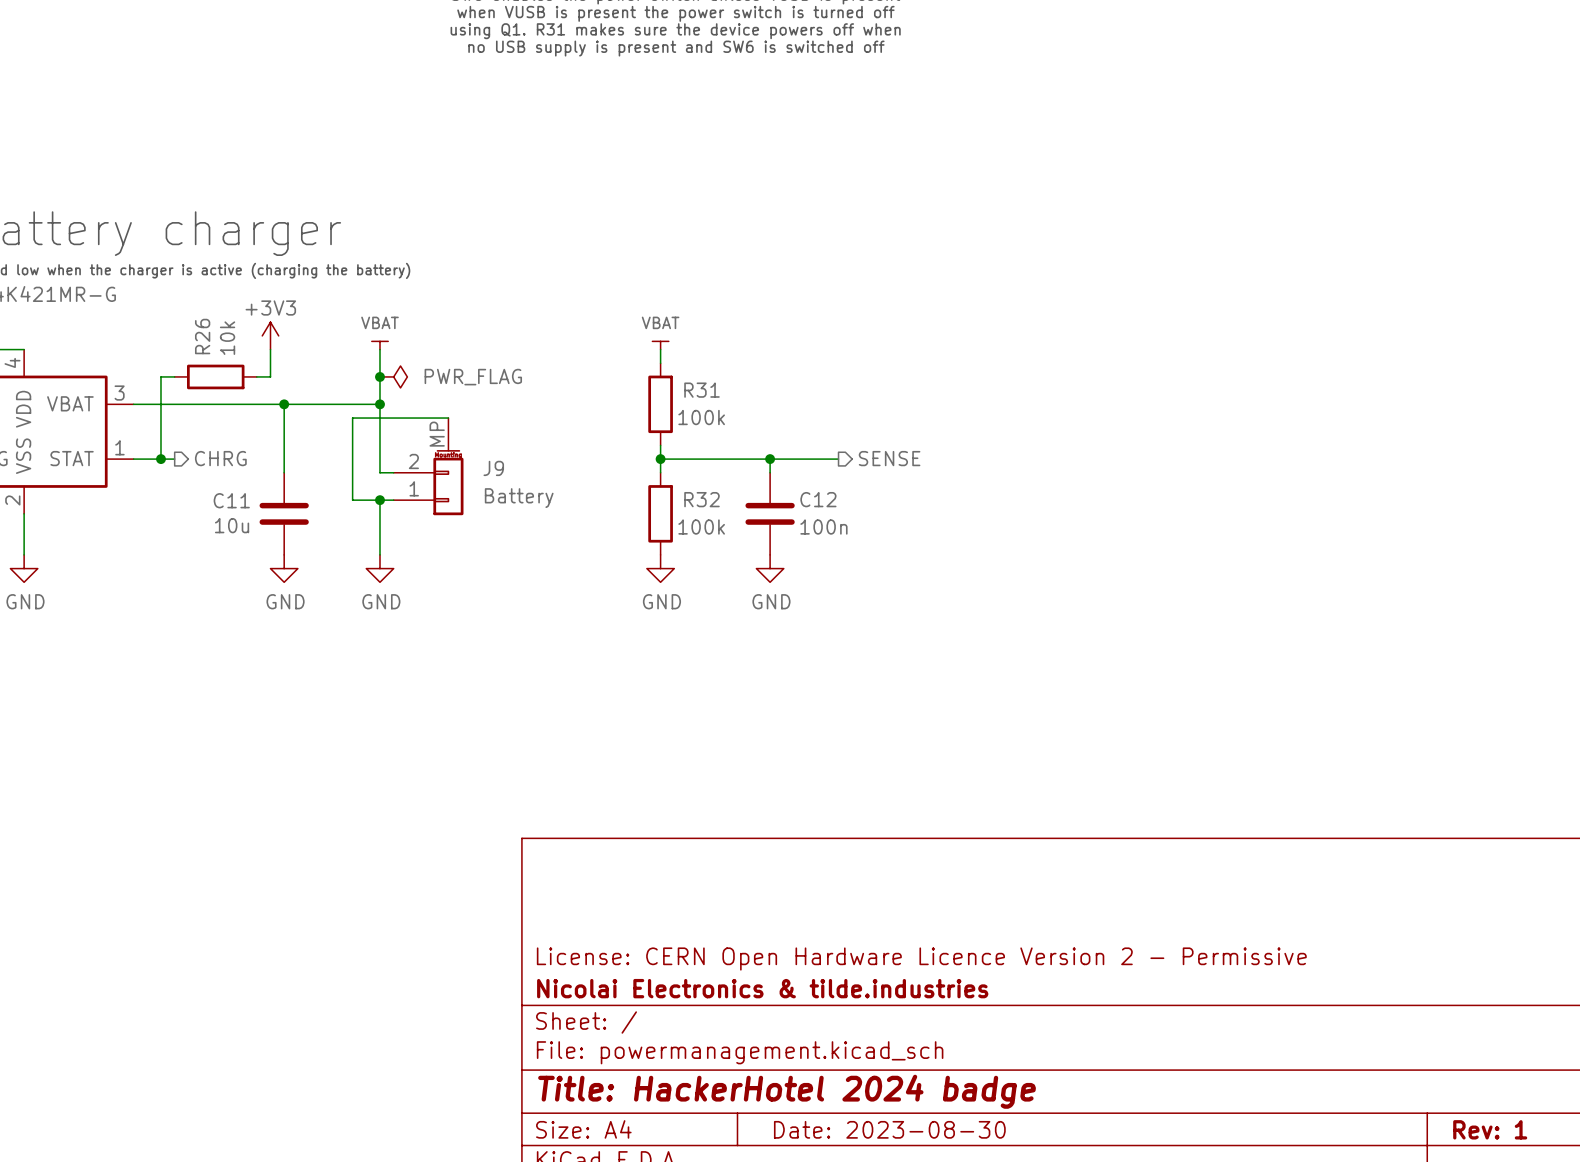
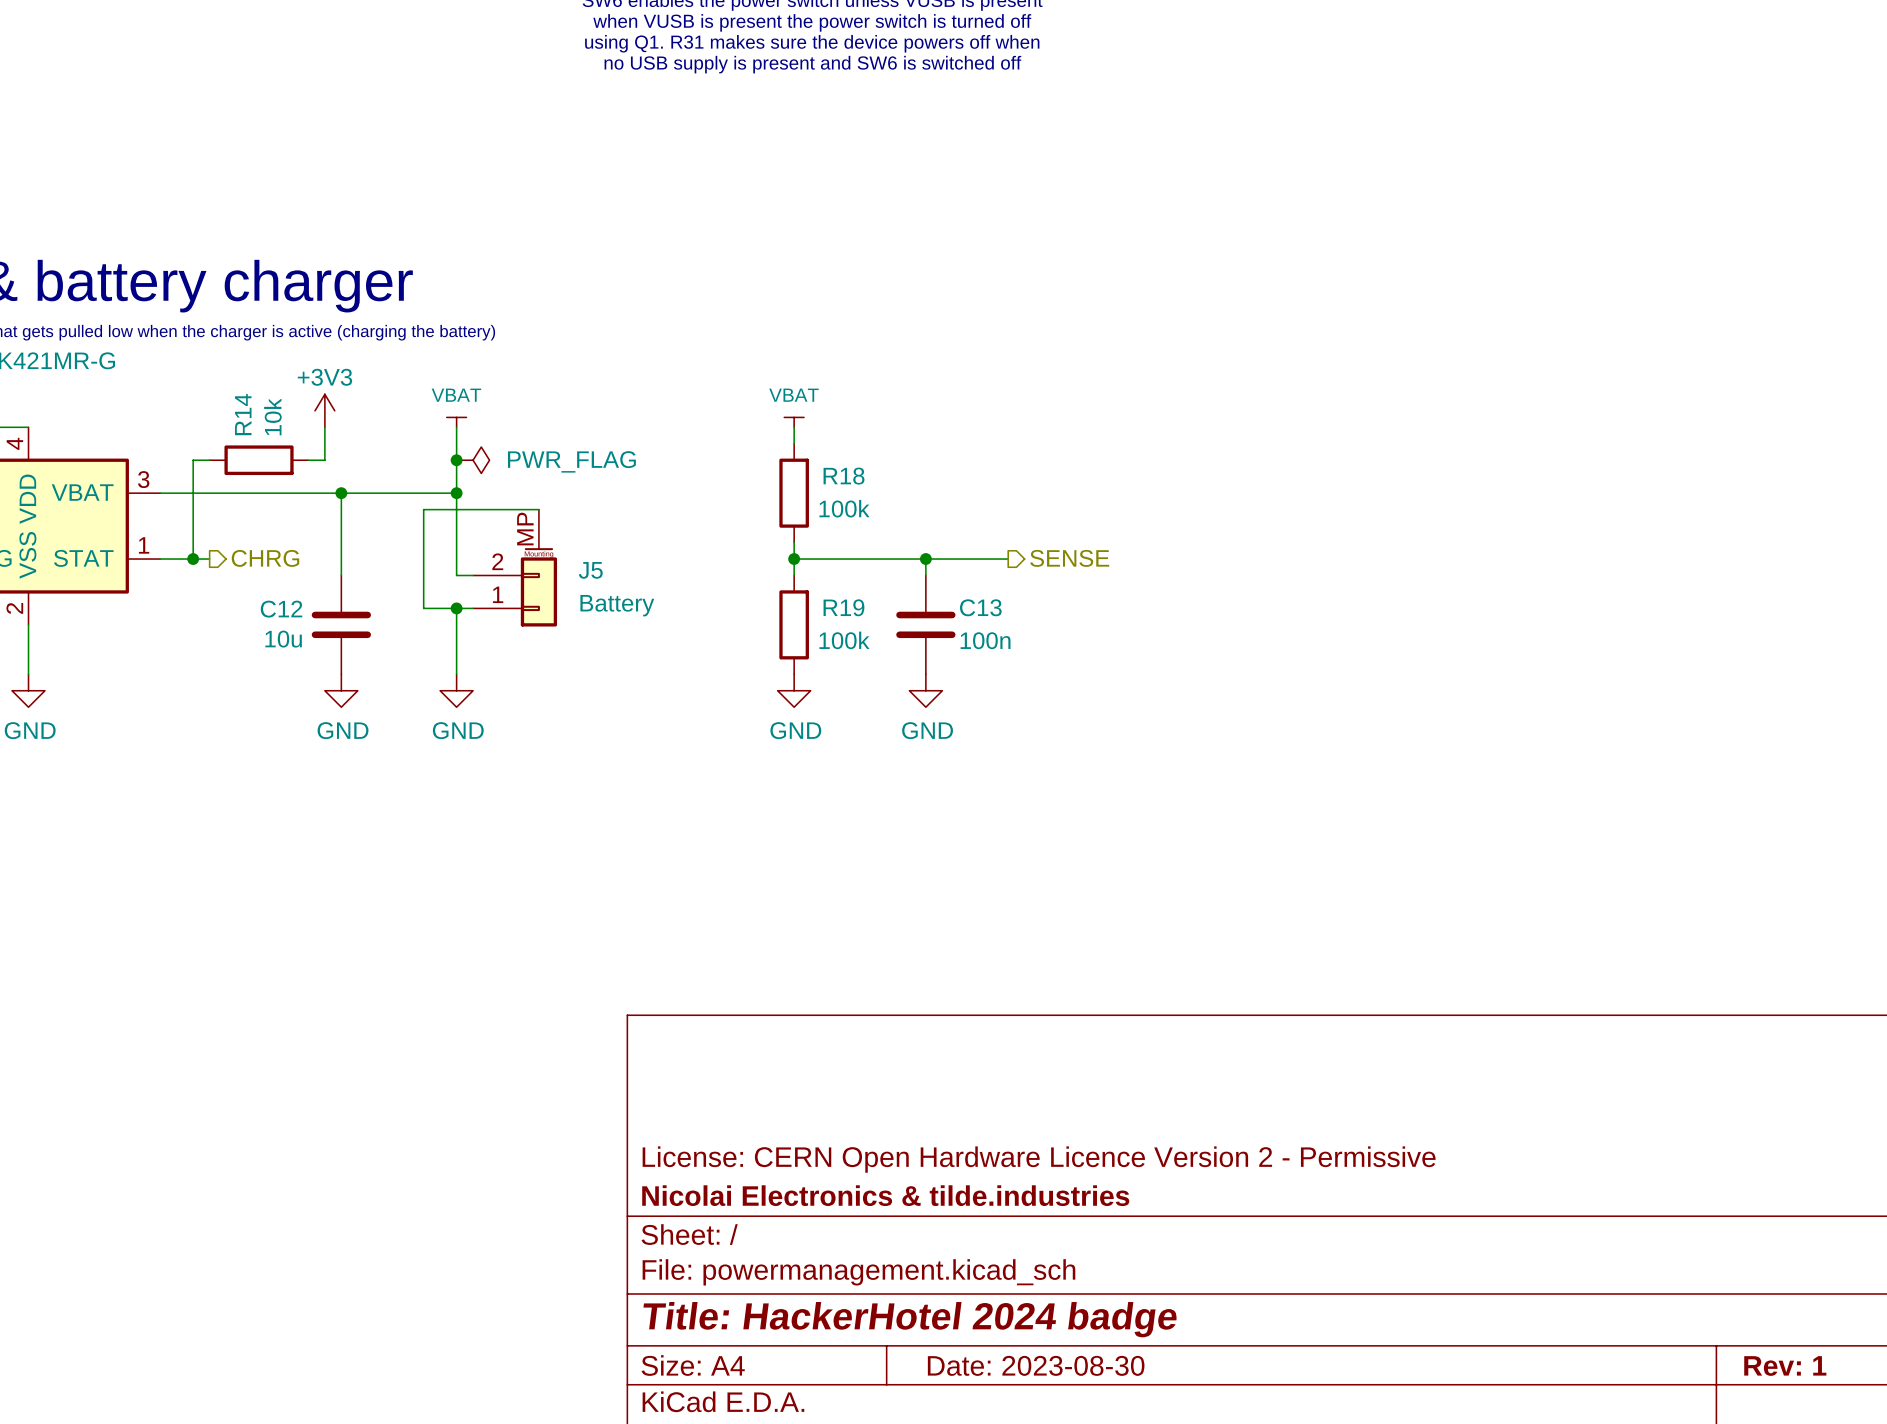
R26 name: R26 (202, 336) -> R14 (243, 414)
R31 name: R31 (701, 390) -> R18 (844, 476)
J9 name: J9 (493, 468) -> J5 (590, 570)
R32 name: R32 (701, 499) -> R19 (843, 607)
C12 name: C12 (818, 499) -> C13 (980, 607)
C11 name: C11 (231, 500) -> C12 (281, 609)

